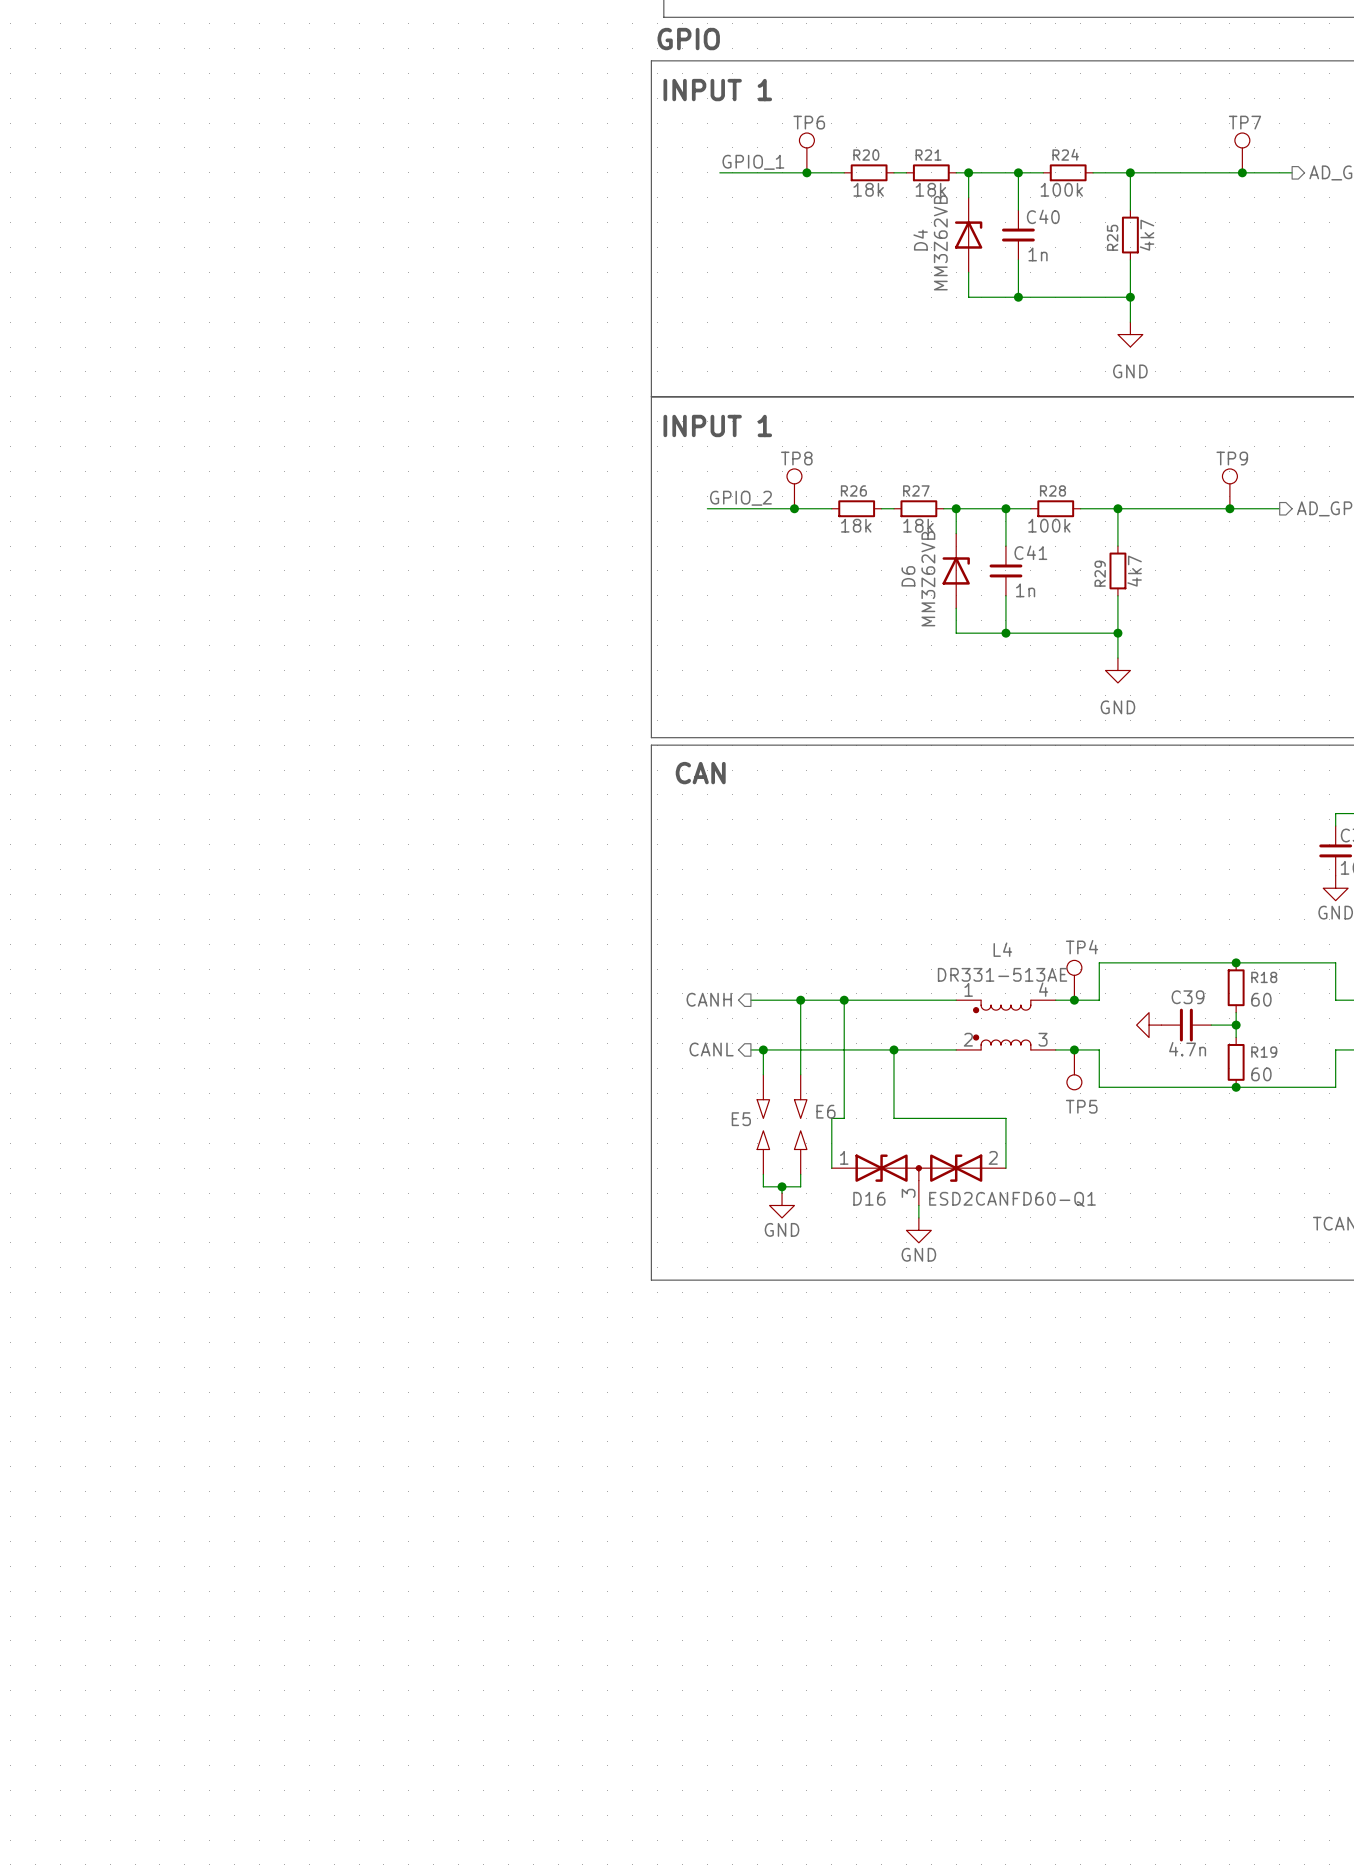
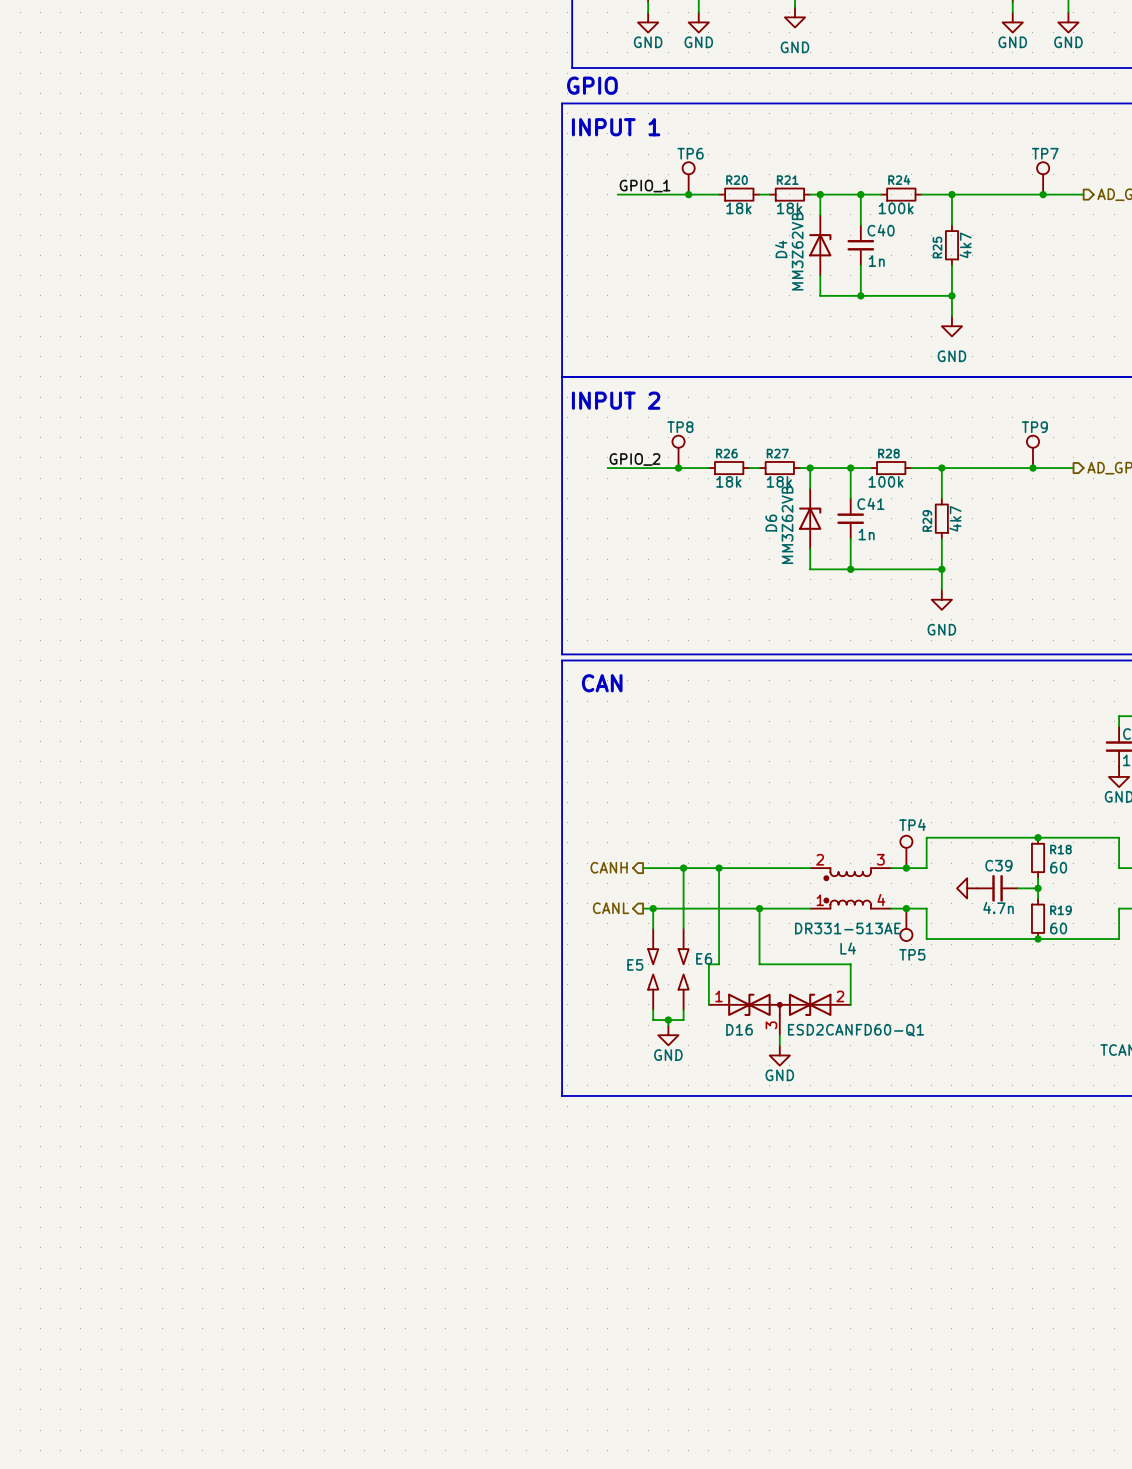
text: INPUT 1 (717, 425) -> INPUT 2 (616, 400)
L4 flip: as is (1002, 1025) -> up-down (847, 888)

